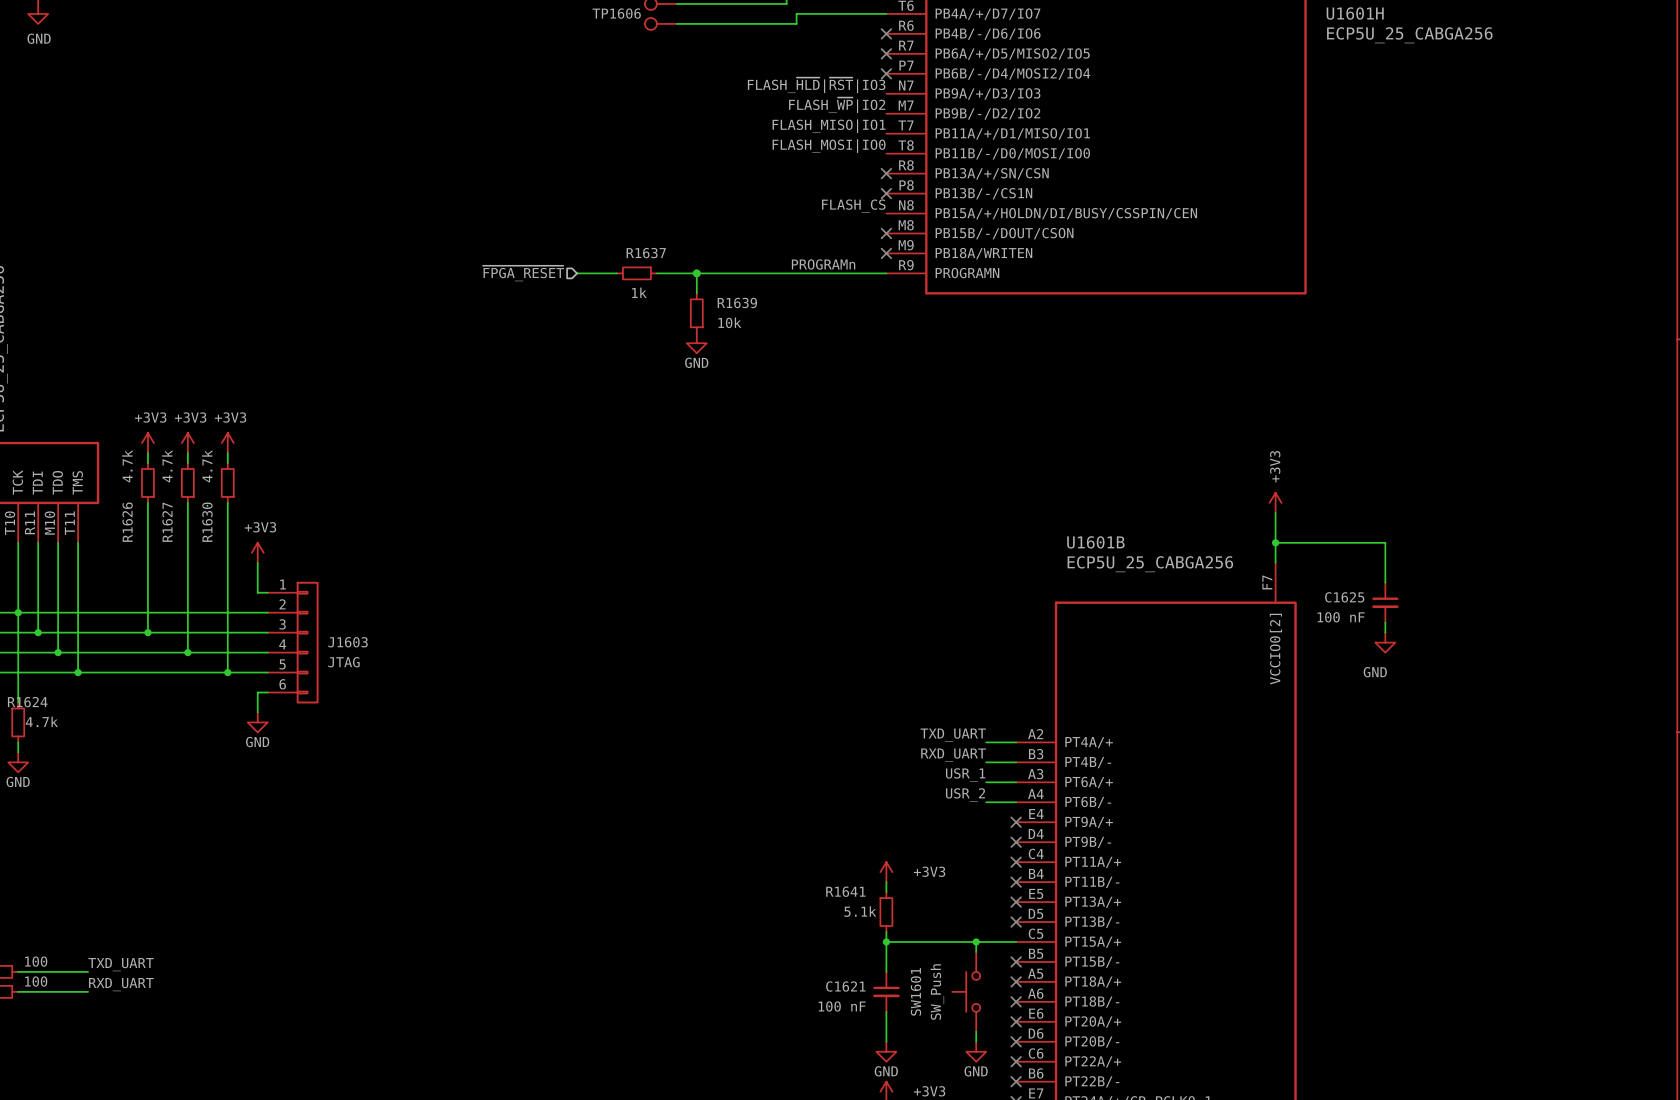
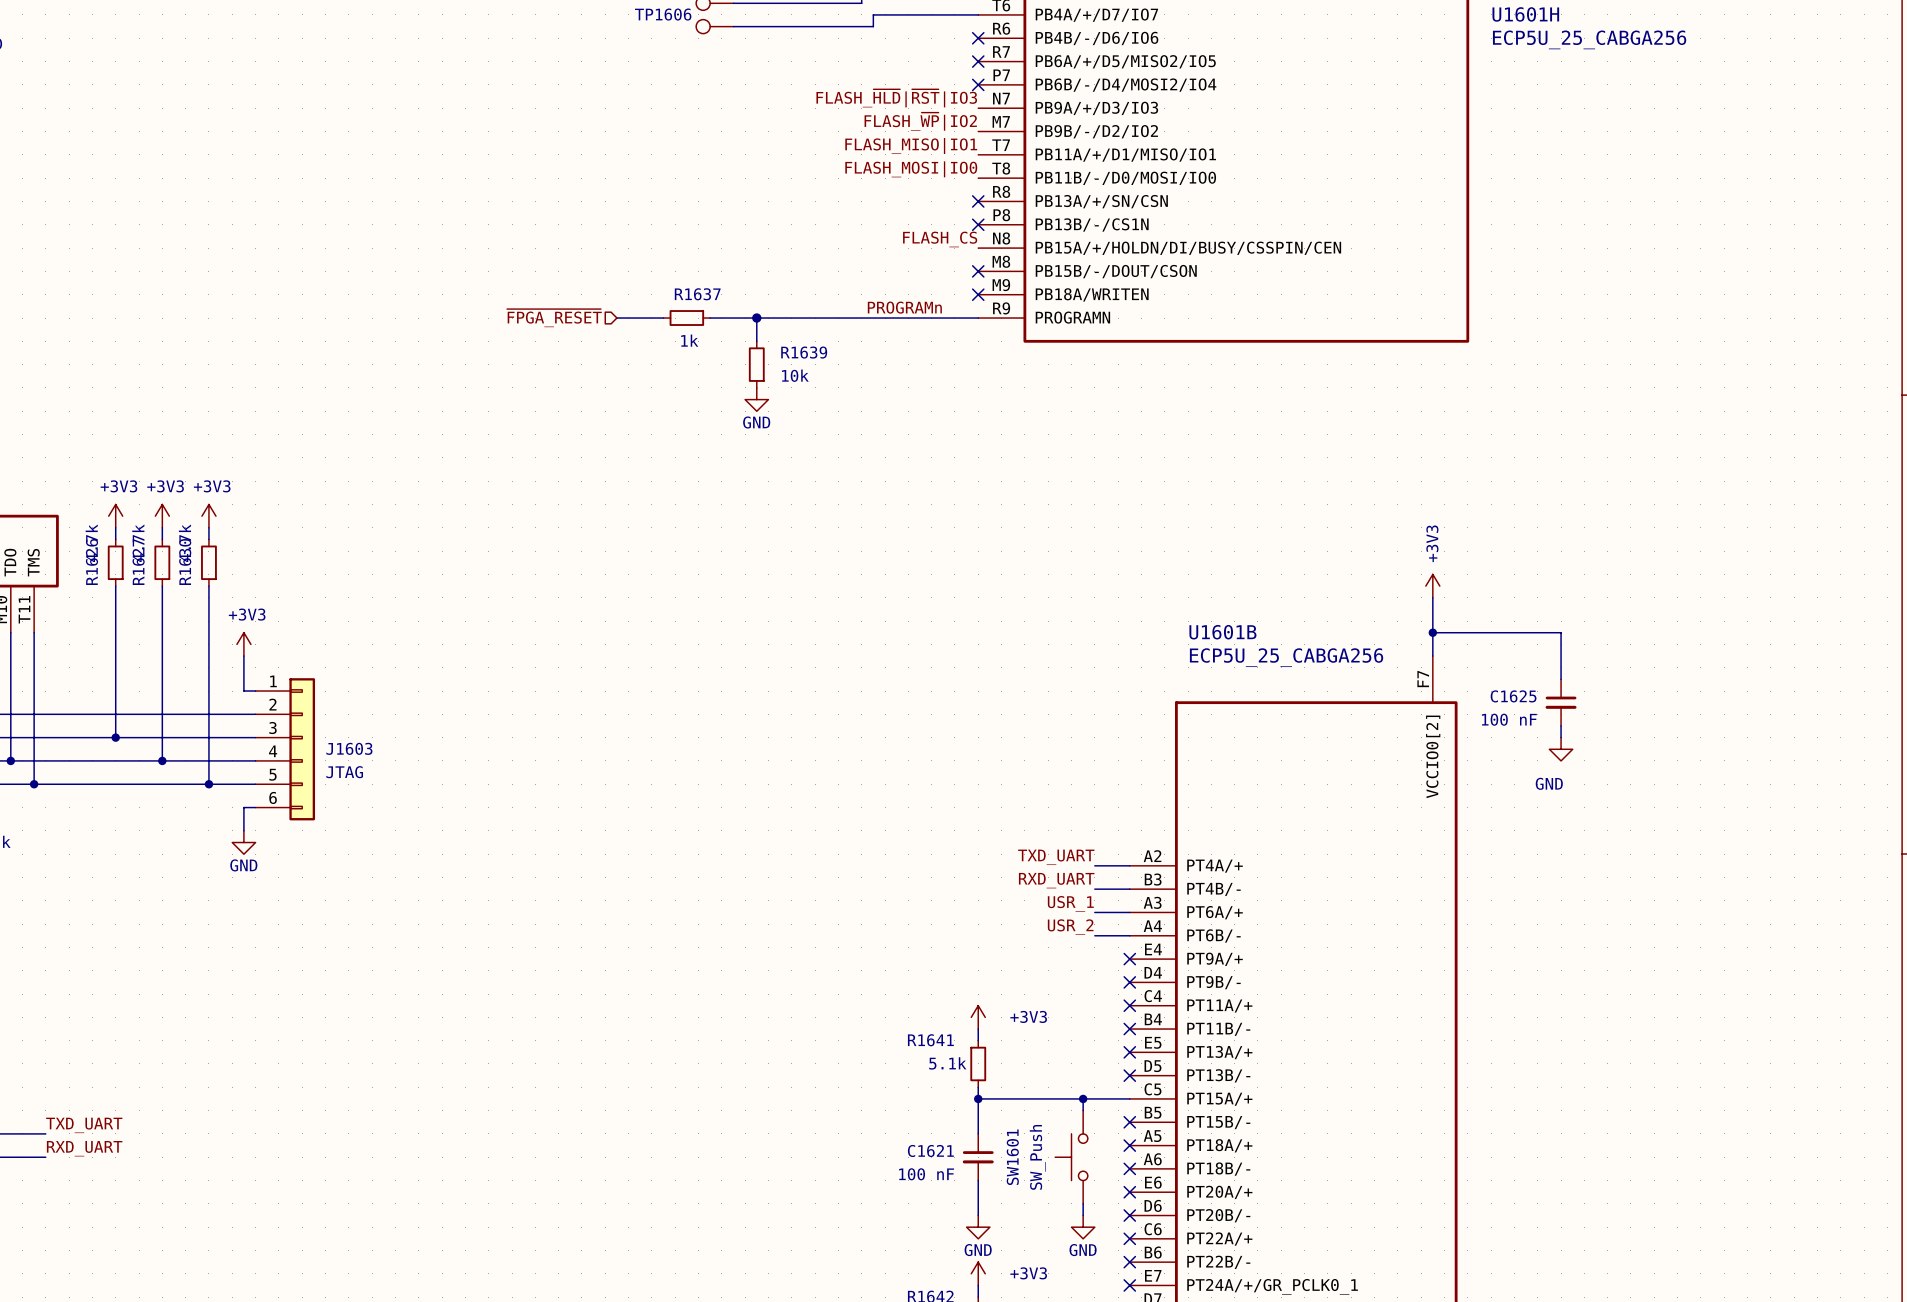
R1626 name position: R1626 (127, 522) -> R1626 (91, 561)
R1627 name position: R1627 (167, 522) -> R1627 (138, 562)
R1630 name position: R1630 (207, 522) -> R1630 (185, 561)

